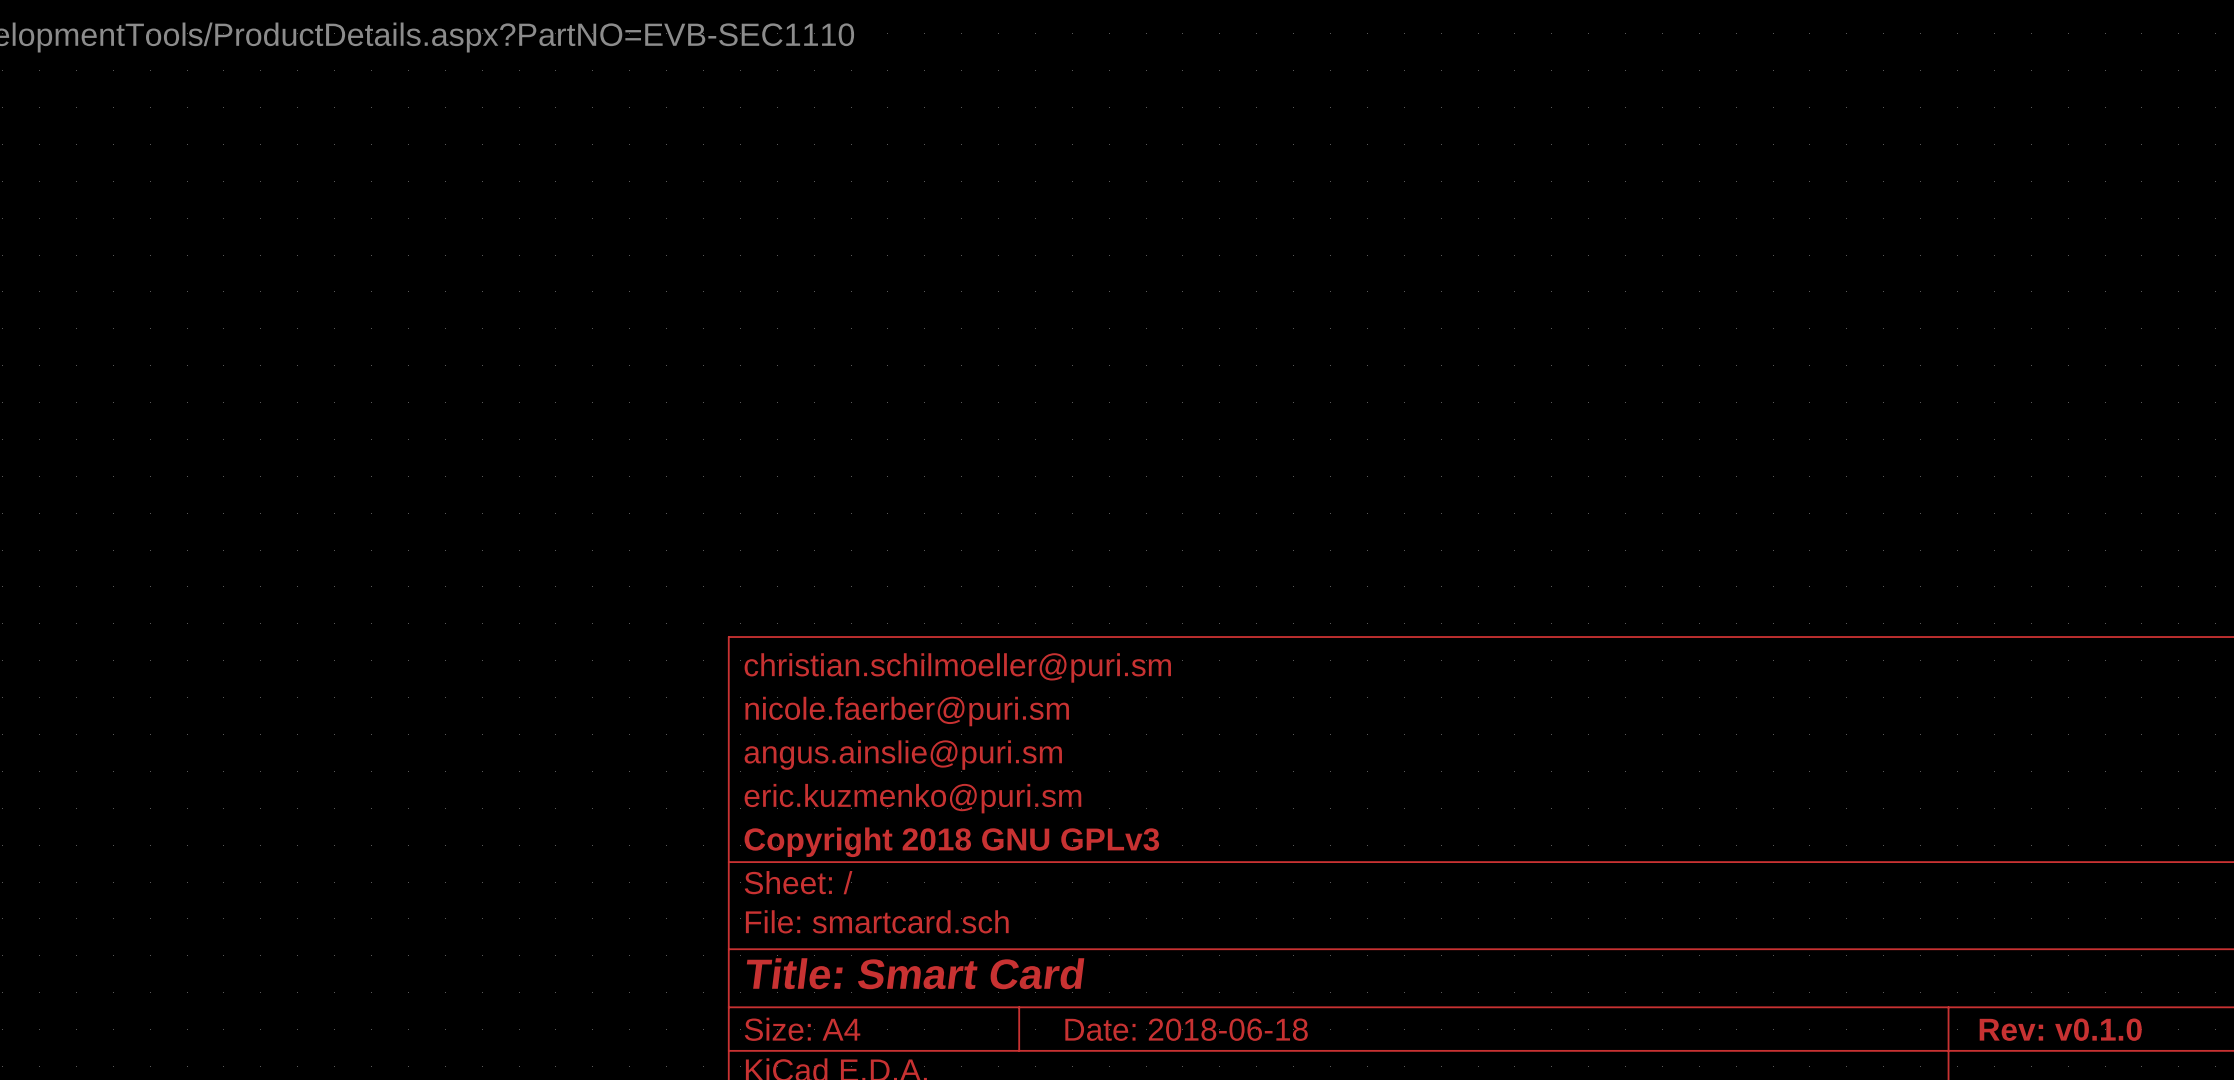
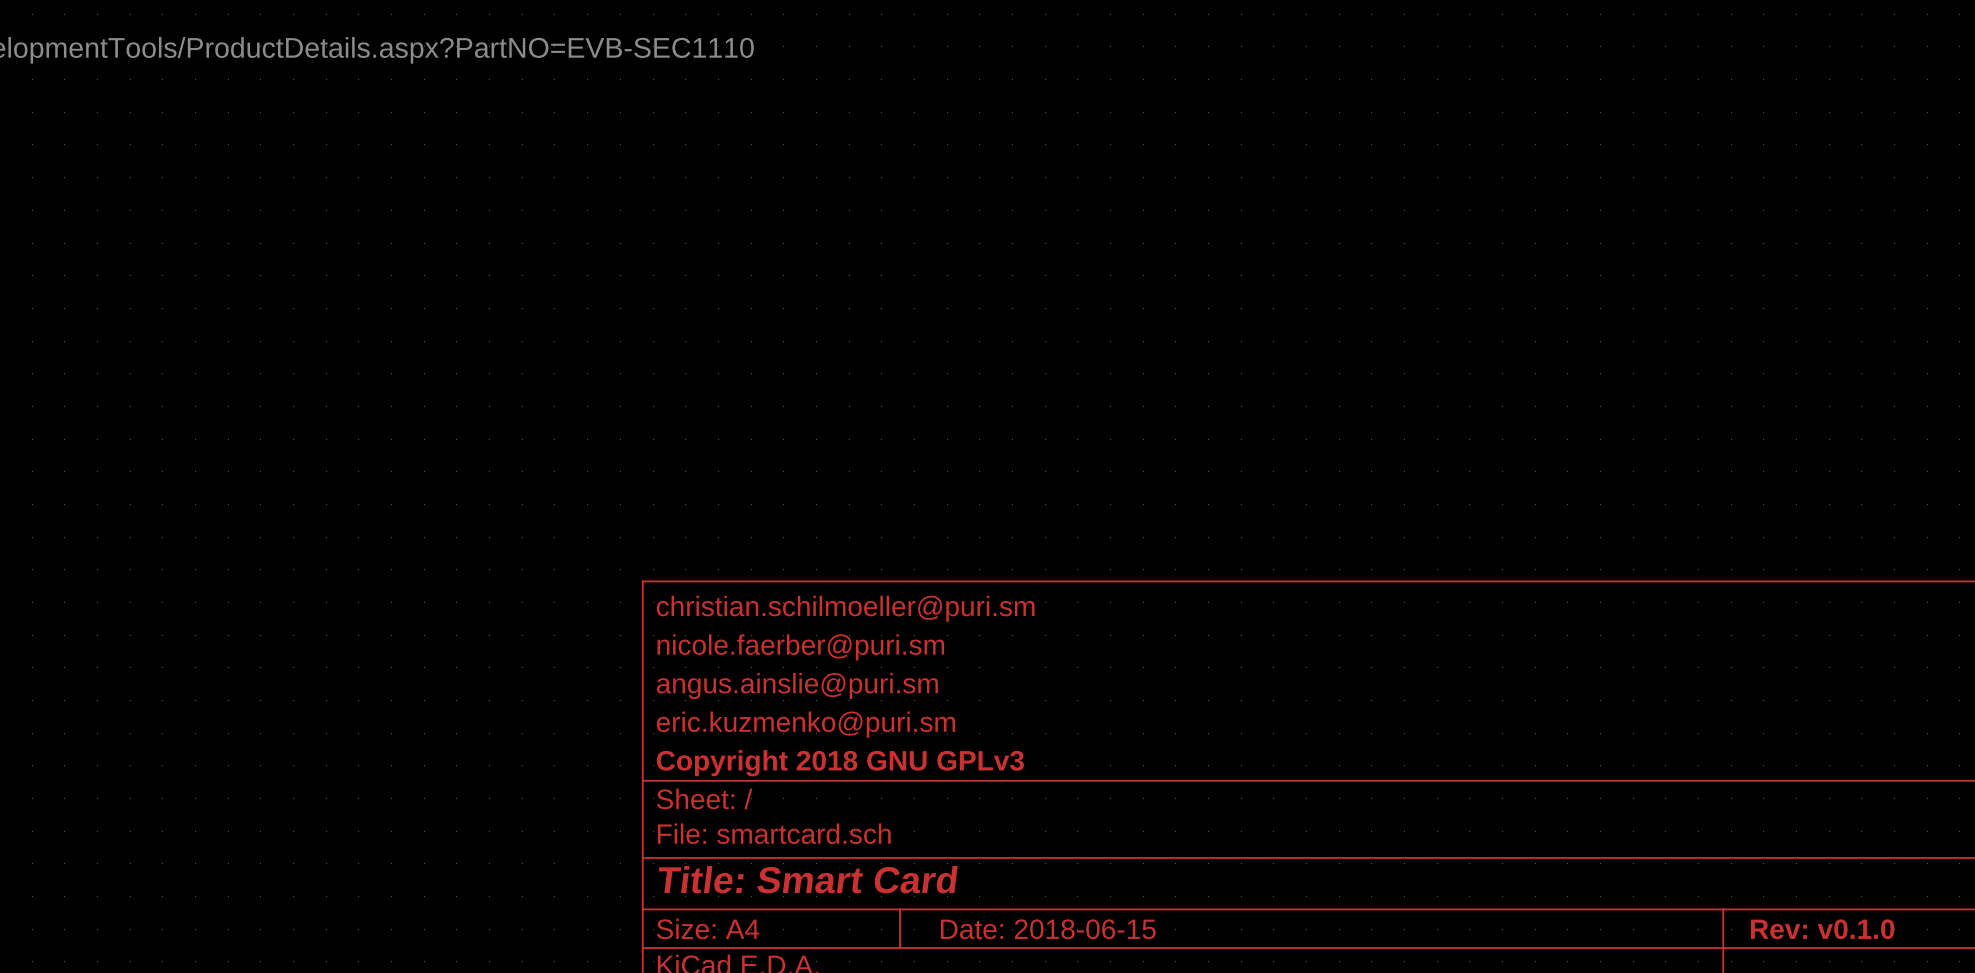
title block: Date: 2018-06-18 (1186, 1029) -> Date: 2018-06-15 (1048, 929)

